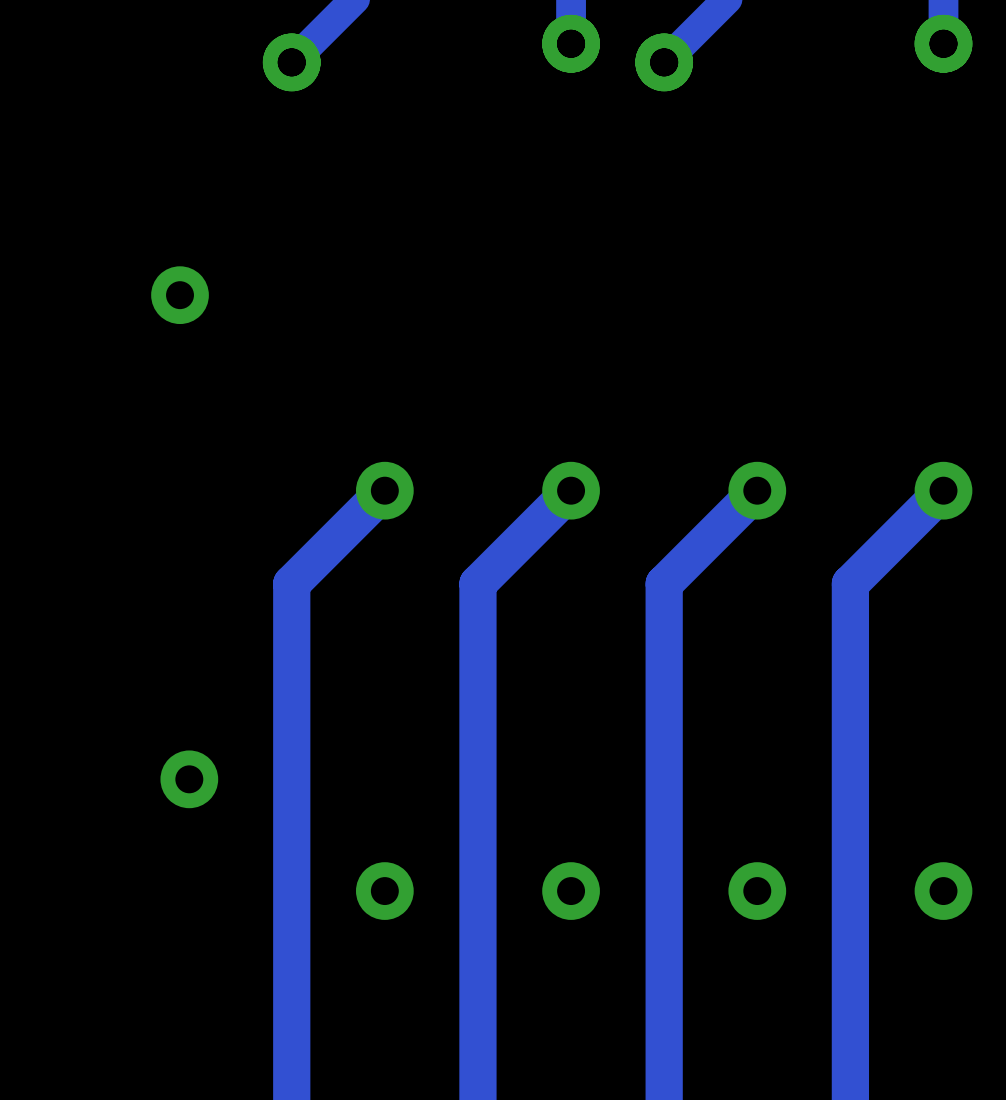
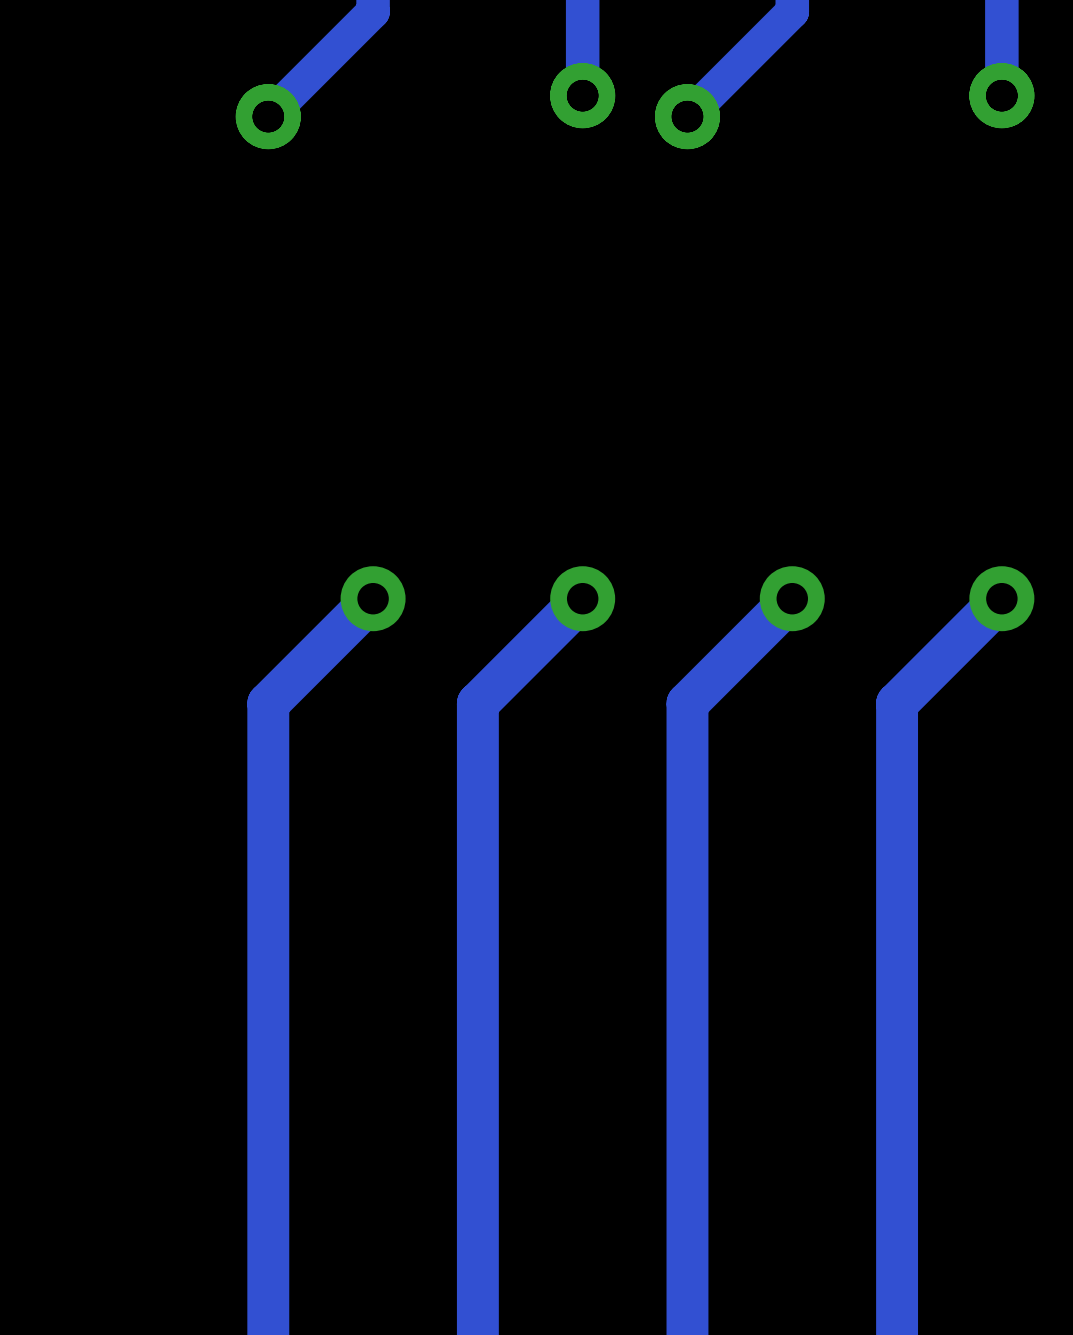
via: (180, 295) -> none
via: (189, 779) -> none
via: (384, 891) -> none
via: (571, 891) -> none
via: (757, 891) -> none
via: (943, 891) -> none

